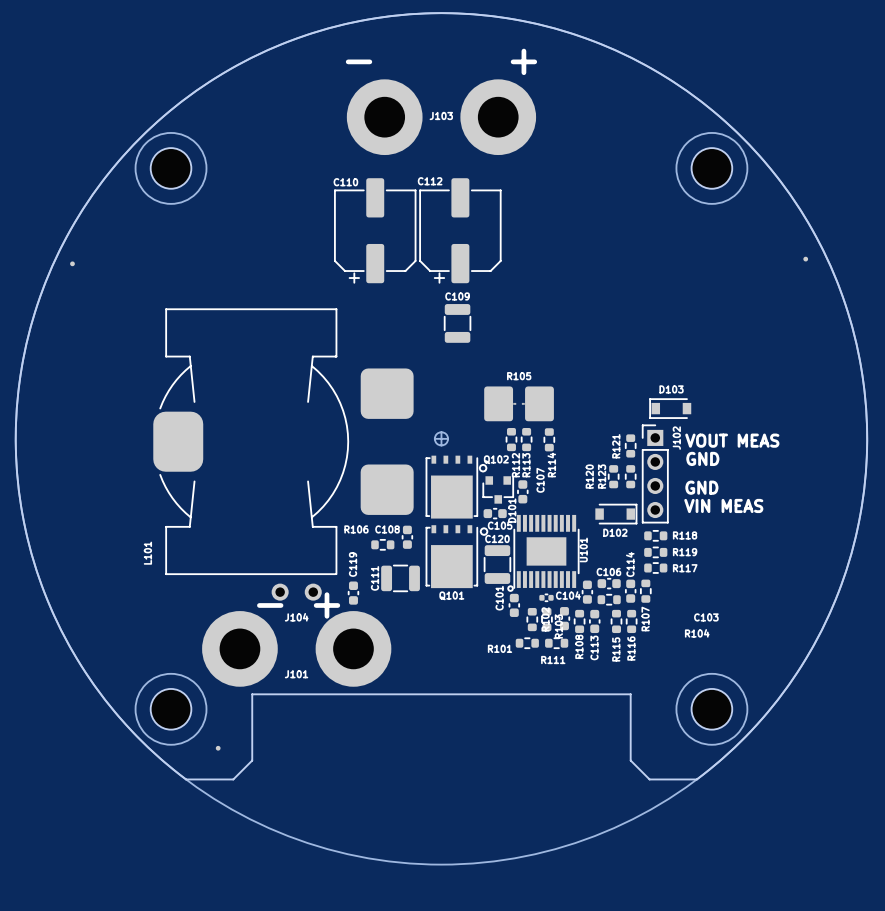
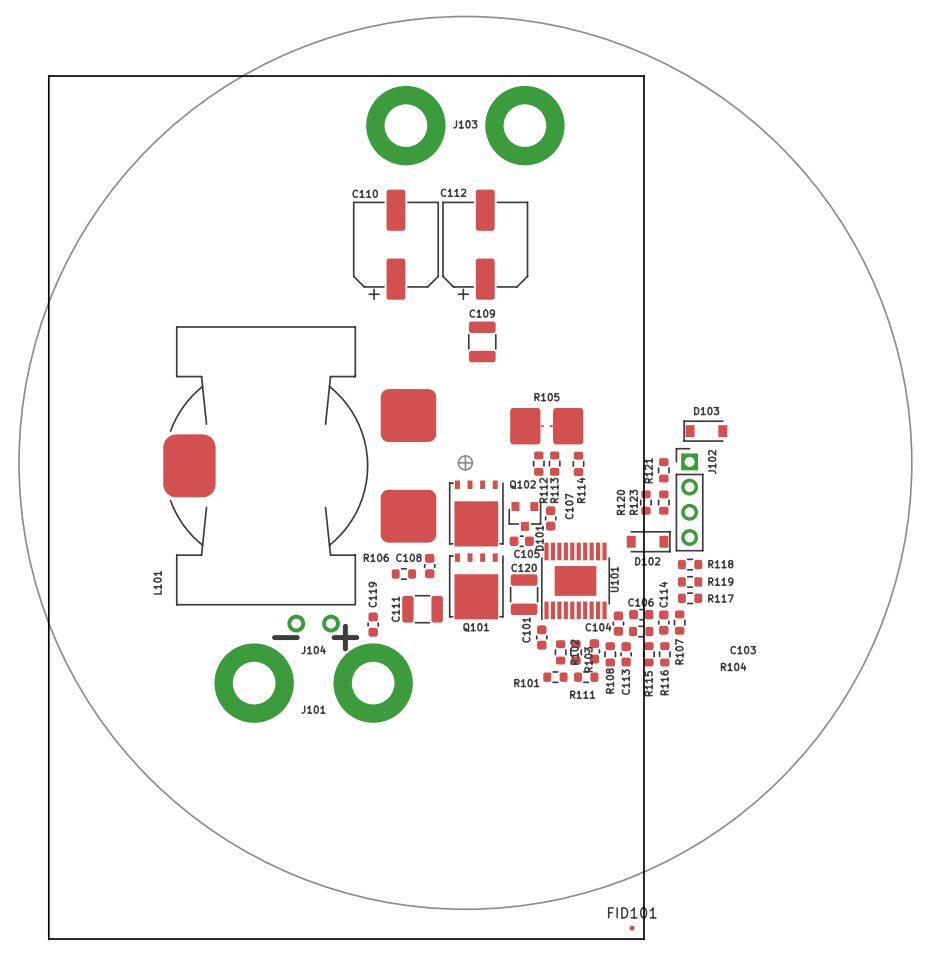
text: + - (441, 61) -> none
part: (171, 168) -> none
part: (711, 168) -> none
part: (805, 259) -> none
part: (72, 263) -> none
text: VOUT MEAS (732, 440) -> none
text: GND (702, 458) -> none
drawing: [478, 463, 488, 473] -> none
text: GND (701, 487) -> none
text: VIN MEAS (723, 505) -> none
drawing: [479, 527, 489, 536] -> none
drawing: [507, 585, 514, 592] -> none
part: (546, 597) -> none
board edge: (252, 694) (252, 760) (233, 779) (186, 779) (136, 736) (94, 686) (76, 658) (54, 615) (31, 554) (21, 506) (16, 457) (16, 408) (23, 359) (35, 312) (52, 266) (74, 222) (102, 181) (122, 156) (157, 121) (195, 91) (223, 73) (252, 57) (297, 38) (344, 24) (392, 15) (425, 13) (474, 14) (522, 20) (554, 28) (601, 44) (630, 57) (659, 73) (700, 100) (737, 132) (760, 156) (780, 181) (808, 222) (830, 266) (842, 296) (856, 343) (862, 375) (866, 424) (866, 457) (861, 506) (855, 538) (846, 569) (828, 615) (805, 658) (778, 699) (746, 736) (696, 779) (649, 779) (630, 760) (630, 694) (252, 694) -> (48, 76) (48, 939) (643, 939) (643, 76) (48, 76)
part: (171, 709) -> none
part: (711, 709) -> none
part: (218, 748) -> none
FID101: none -> (632, 928)

